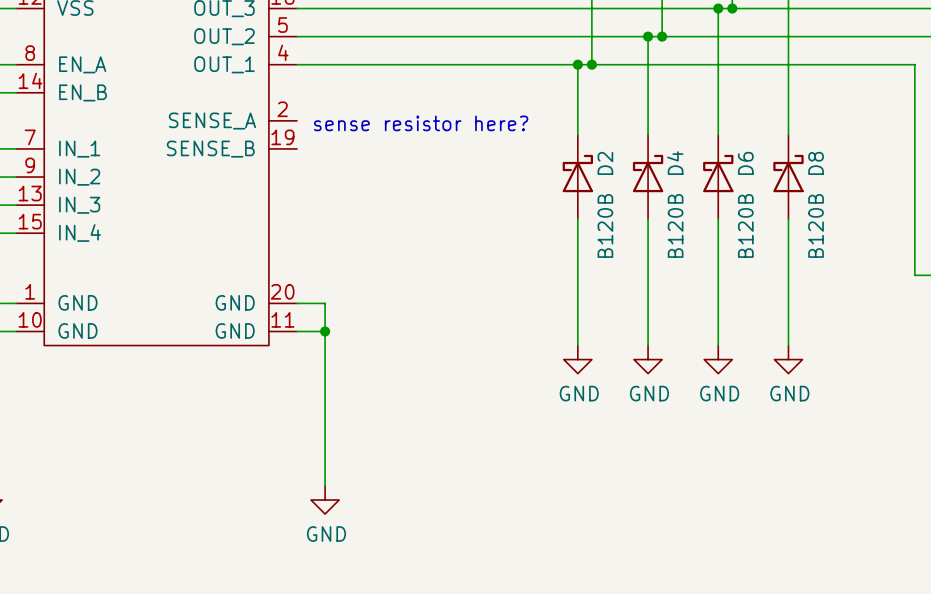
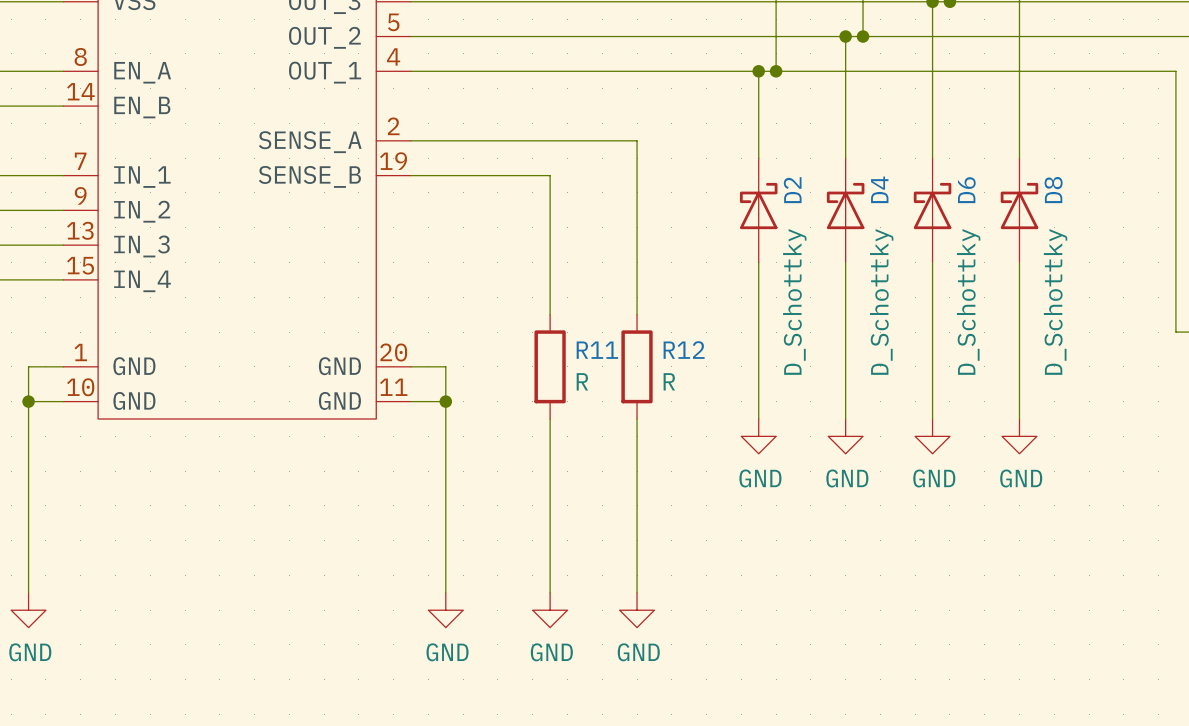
wire: none -> (411, 140) (637, 140) (637, 314)
text: sense resistor here? (421, 123) -> none
wire: none -> (411, 175) (550, 175) (550, 314)
D2 value: B120B (605, 225) -> D_Schottky (794, 301)
D4 value: B120B (675, 225) -> D_Schottky (881, 301)
D6 value: B120B (745, 225) -> D_Schottky (968, 301)
D8 value: B120B (816, 225) -> D_Schottky (1055, 301)
R11: none -> R (550, 366)
R12: none -> R (637, 366)
wire: none -> (550, 418) (550, 592)
wire: none -> (637, 418) (637, 592)
power symbol: none -> GND (550, 610)
power symbol: none -> GND (637, 610)

